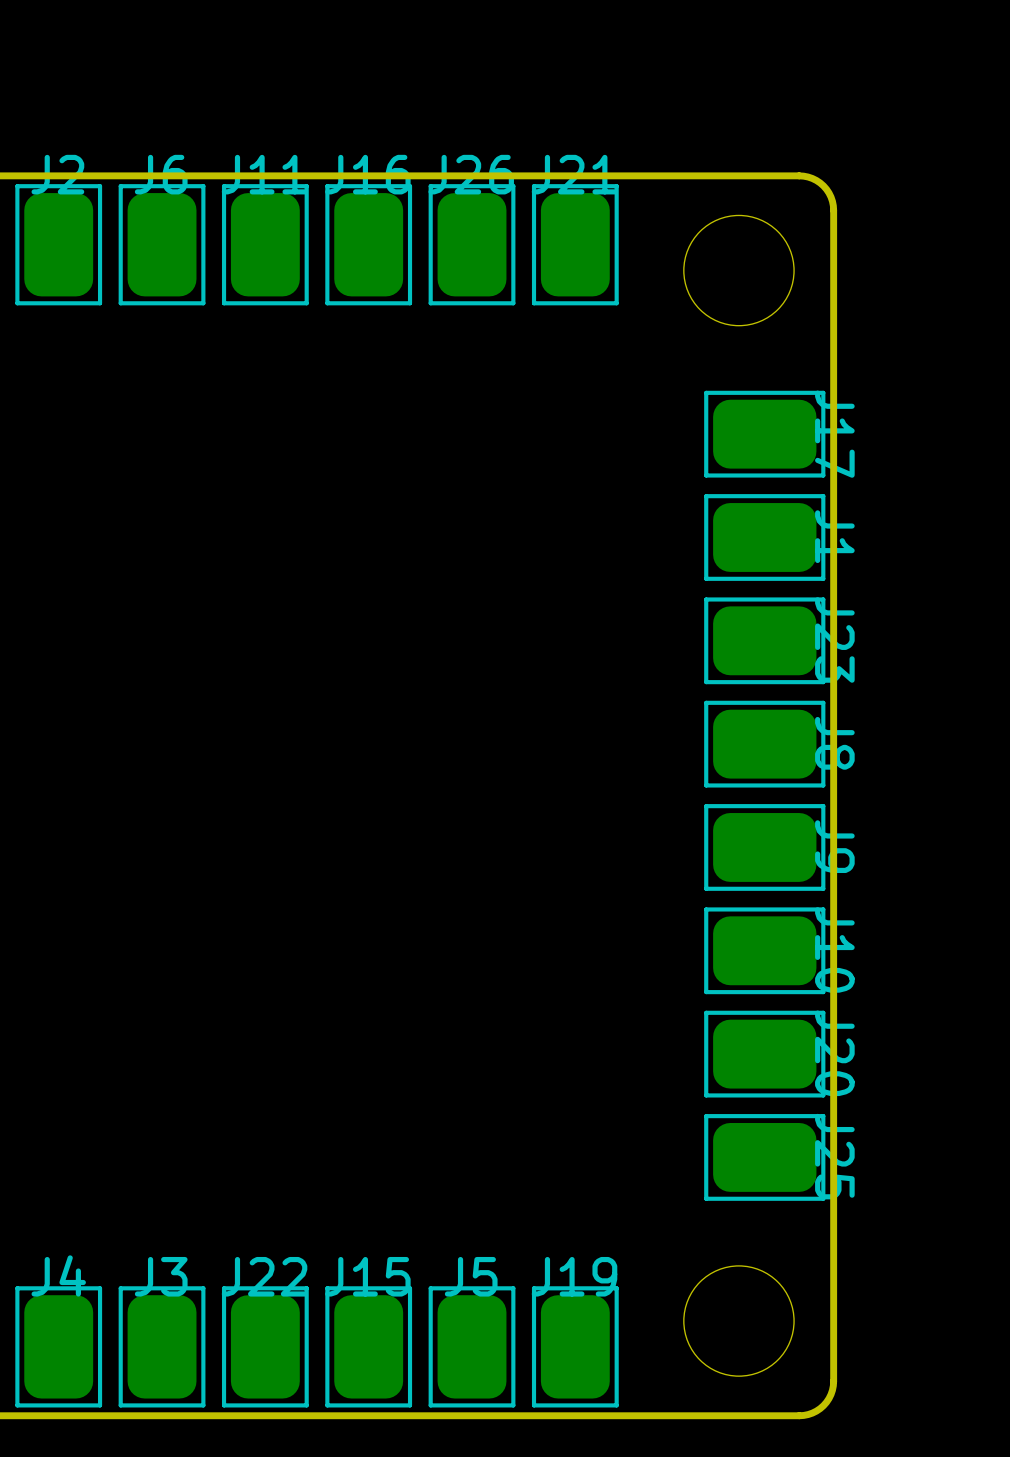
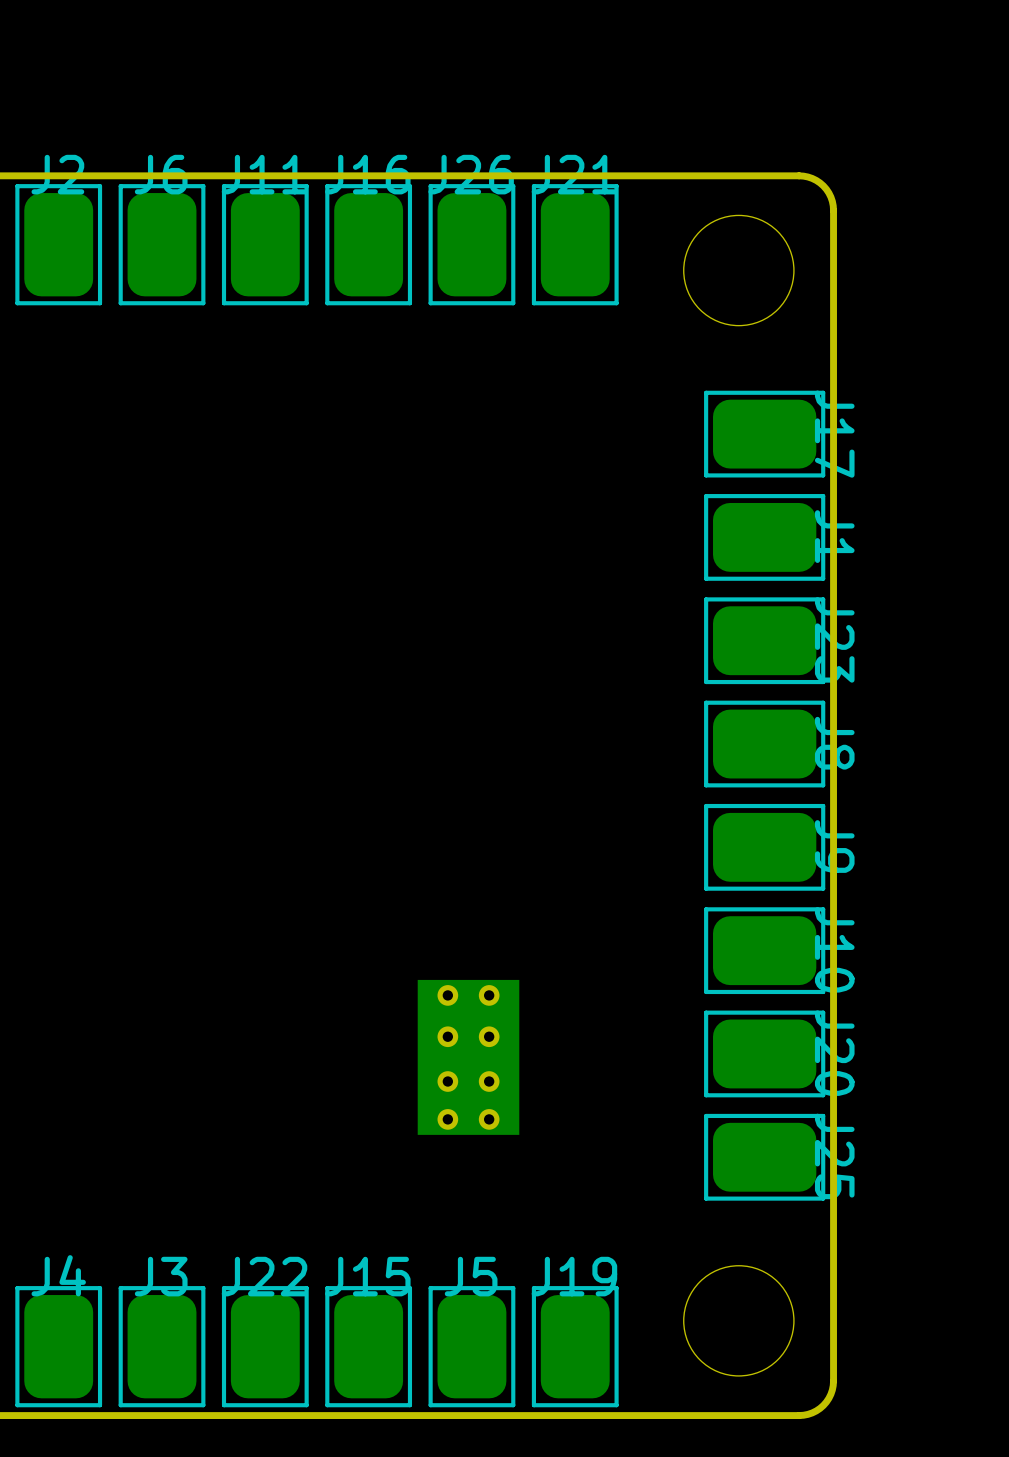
part: none -> (468, 1057)

